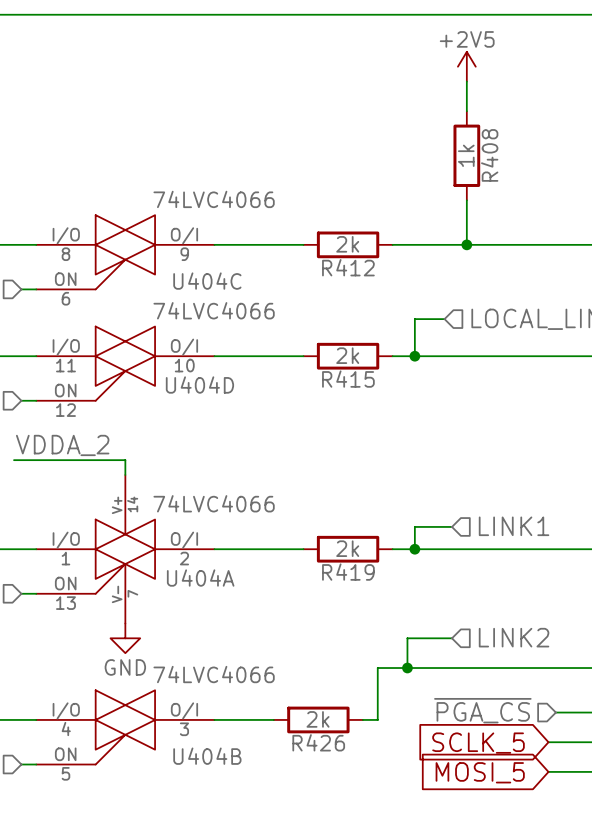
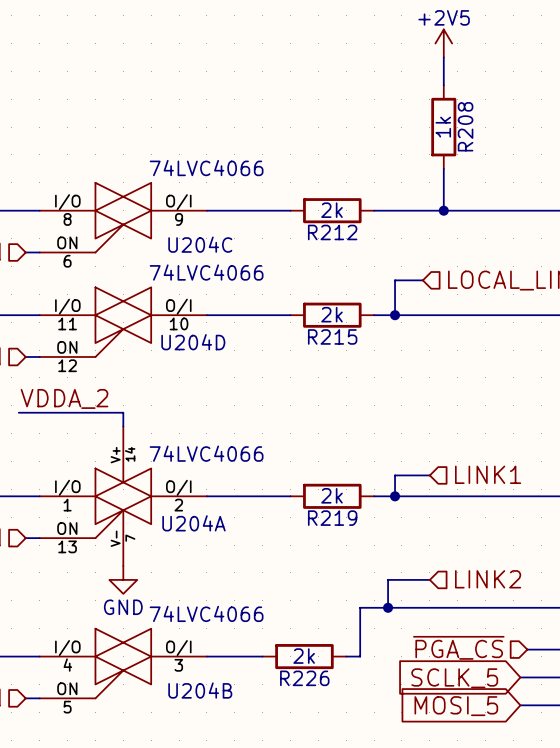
R408 name: R408 (489, 155) -> R208 (465, 126)
R412 name: R412 (348, 267) -> R212 (332, 232)
U404C name: U404C (207, 281) -> U204C (200, 244)
R415 name: R415 (348, 379) -> R215 (332, 336)
U404D name: U404D (199, 385) -> U204D (193, 342)
R419 name: R419 (348, 572) -> R219 (332, 518)
U404A name: U404A (200, 578) -> U204A (193, 523)
R426 name: R426 (318, 742) -> R226 (304, 678)
U404B name: U404B (207, 756) -> U204B (200, 690)

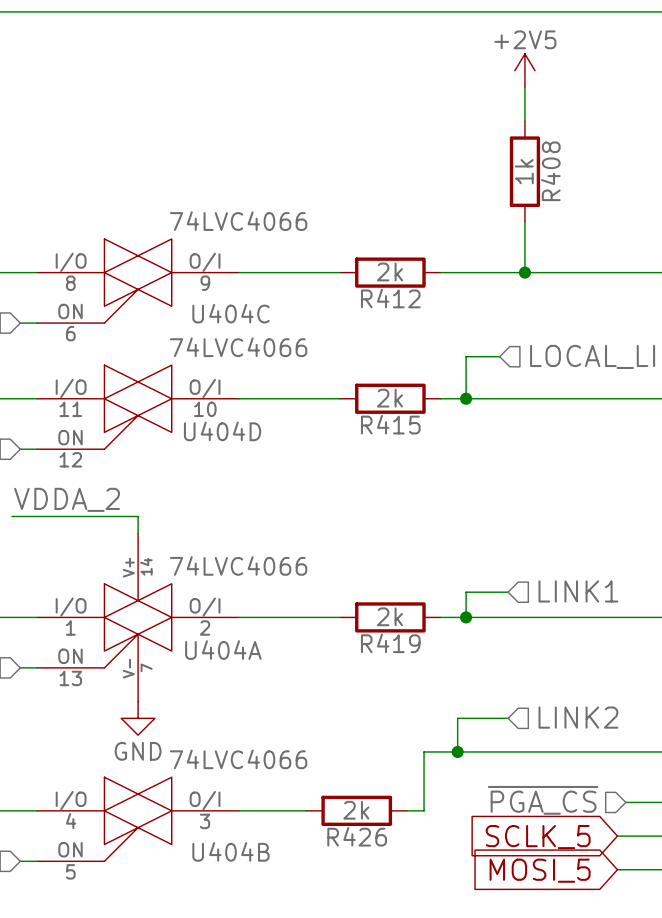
R208 name: R208 (465, 126) -> R408 (550, 171)
R212 name: R212 (332, 232) -> R412 (390, 298)
U204C name: U204C (200, 244) -> U404C (230, 313)
R215 name: R215 (332, 336) -> R415 (390, 424)
U204D name: U204D (193, 342) -> U404D (222, 431)
R219 name: R219 (332, 518) -> R419 (390, 643)
U204A name: U204A (193, 523) -> U404A (223, 650)
R226 name: R226 (304, 678) -> R426 (357, 836)
U204B name: U204B (200, 690) -> U404B (230, 851)

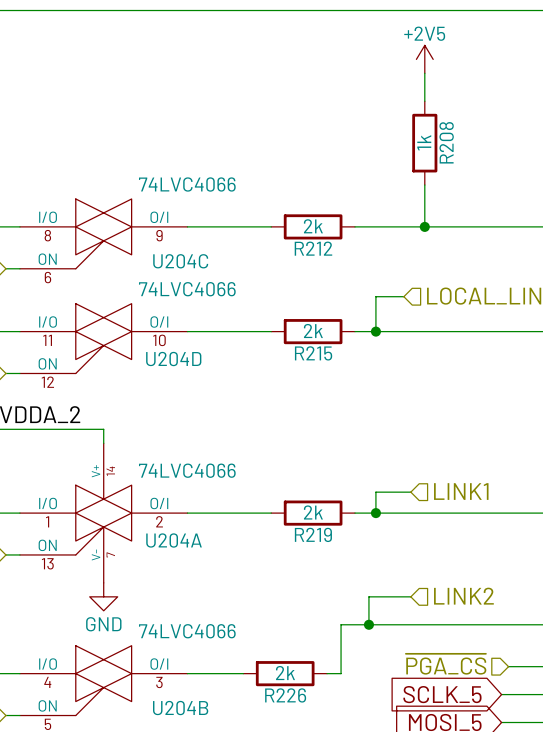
R408 name: R408 (550, 171) -> R208 (446, 142)
R412 name: R412 (390, 298) -> R212 (313, 248)
U404C name: U404C (230, 313) -> U204C (180, 261)
R415 name: R415 (390, 424) -> R215 (313, 353)
U404D name: U404D (222, 431) -> U204D (173, 359)
R419 name: R419 (390, 643) -> R219 (313, 534)
U404A name: U404A (223, 650) -> U204A (174, 540)
R426 name: R426 (357, 836) -> R226 (285, 695)
U404B name: U404B (230, 851) -> U204B (180, 708)

